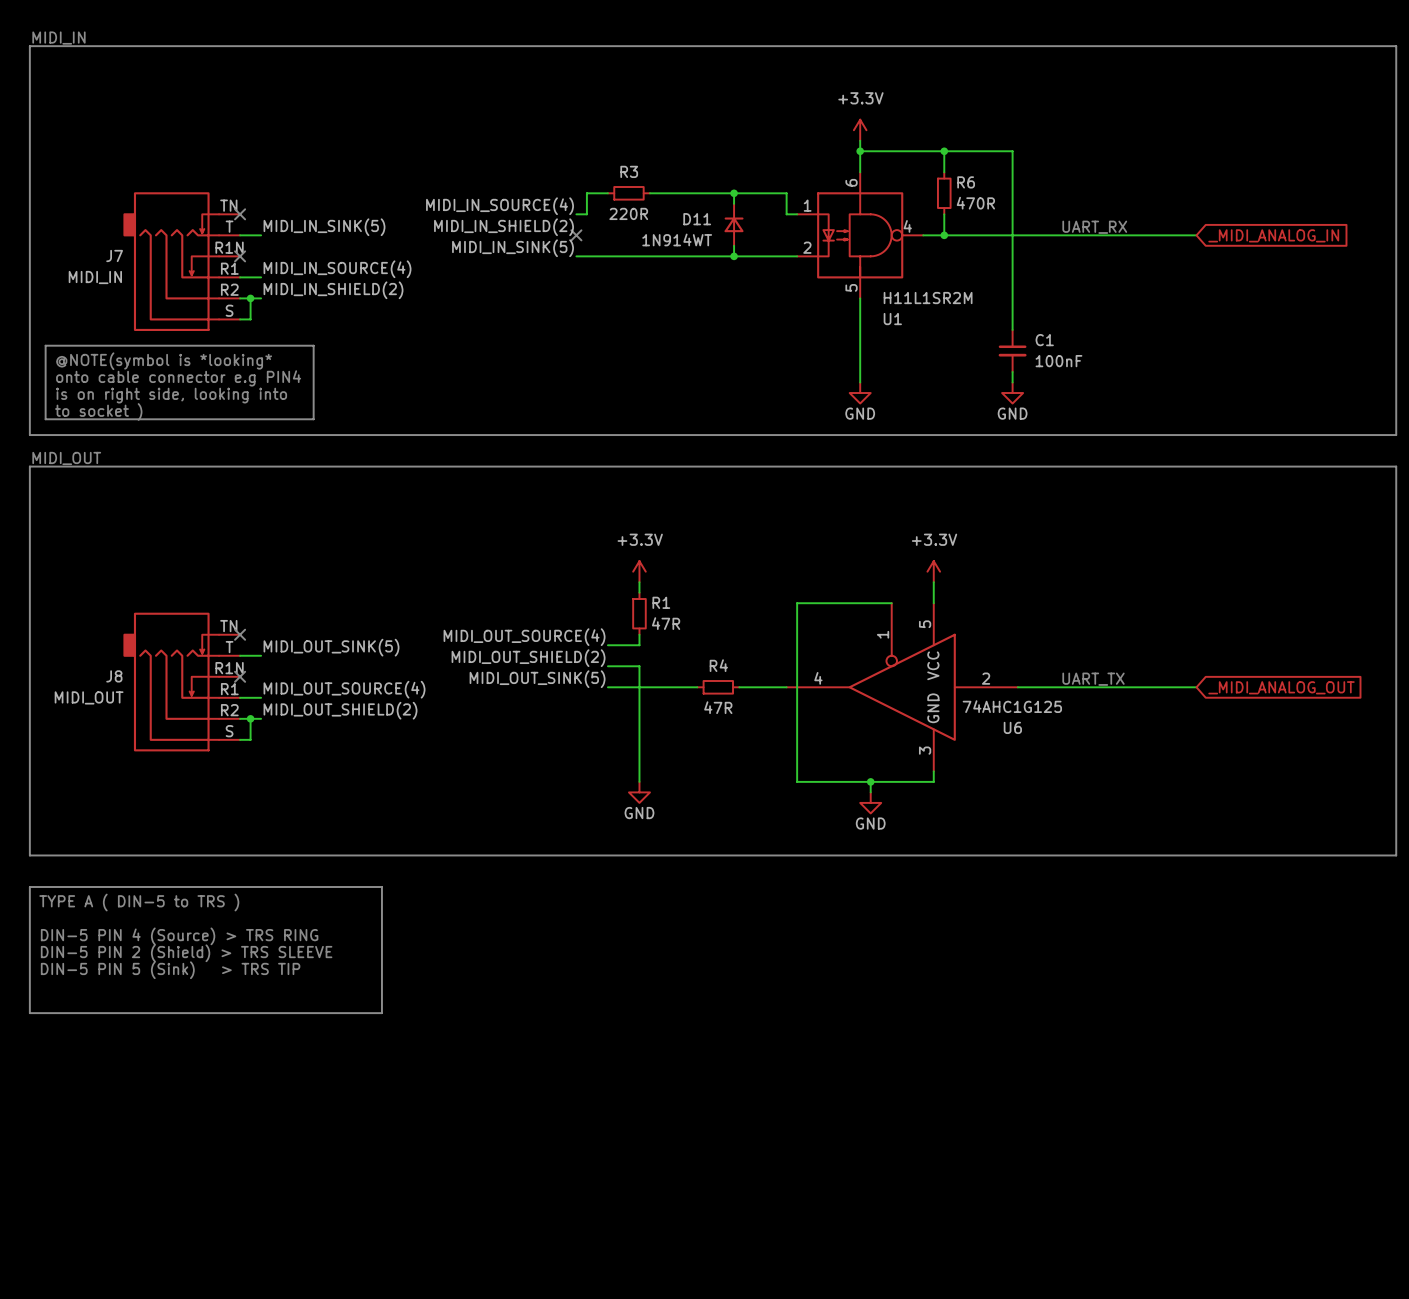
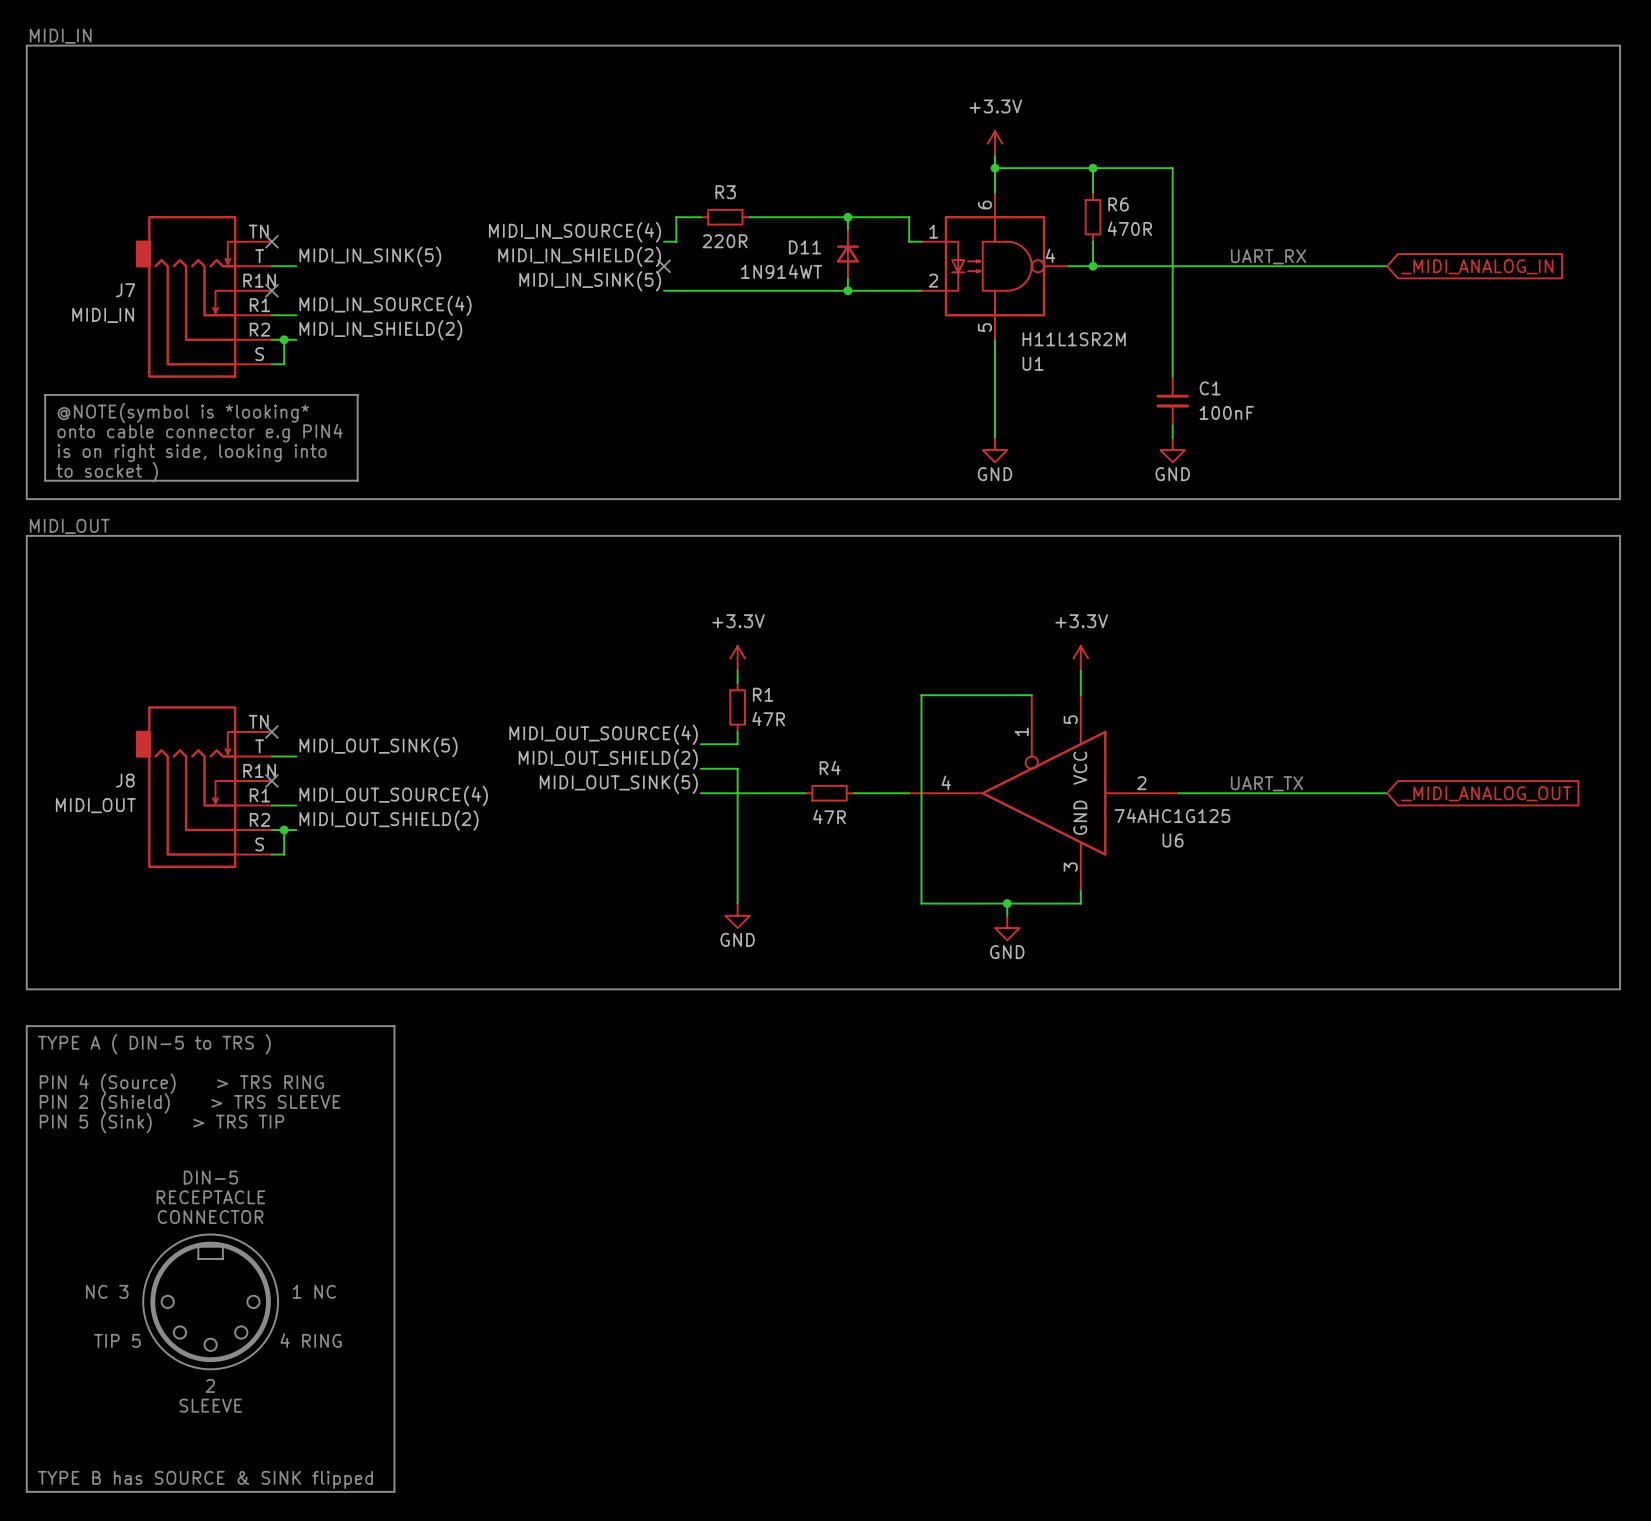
line: (345, 887) (381, 887) (381, 1013) (29, 1013) -> (394, 1026) (394, 1491) (26, 1491) (26, 1173)
text: DIN-5 PIN 4 (Source) > TRS RING (179, 936) -> PIN 4 (Source) > TRS RING (181, 1083)
text: DIN-5 PIN 2 (Shield) > TRS SLEEVE (186, 953) -> PIN 2 (Shield) > TRS SLEEVE (189, 1103)
text: DIN-5 PIN 5 (Sink) > TRS TIP (170, 970) -> PIN 5 (Sink) > TRS TIP (161, 1123)
text: none -> DIN-5 (210, 1177)
text: none -> RECEPTACLE (210, 1197)
text: none -> CONNECTOR (210, 1217)
drawing: none -> [142, 1233, 279, 1370]
line: none -> (198, 1246) (222, 1246) (222, 1258) (198, 1258) (198, 1246)
text: none -> NC 3 (107, 1291)
text: none -> 1 NC (314, 1291)
text: none -> TIP 5 (117, 1340)
text: none -> 4 RING (311, 1340)
text: none -> 2 (210, 1385)
text: none -> SLEEVE (210, 1405)
text: none -> TYPE B has SOURCE & SINK flipped (205, 1479)

